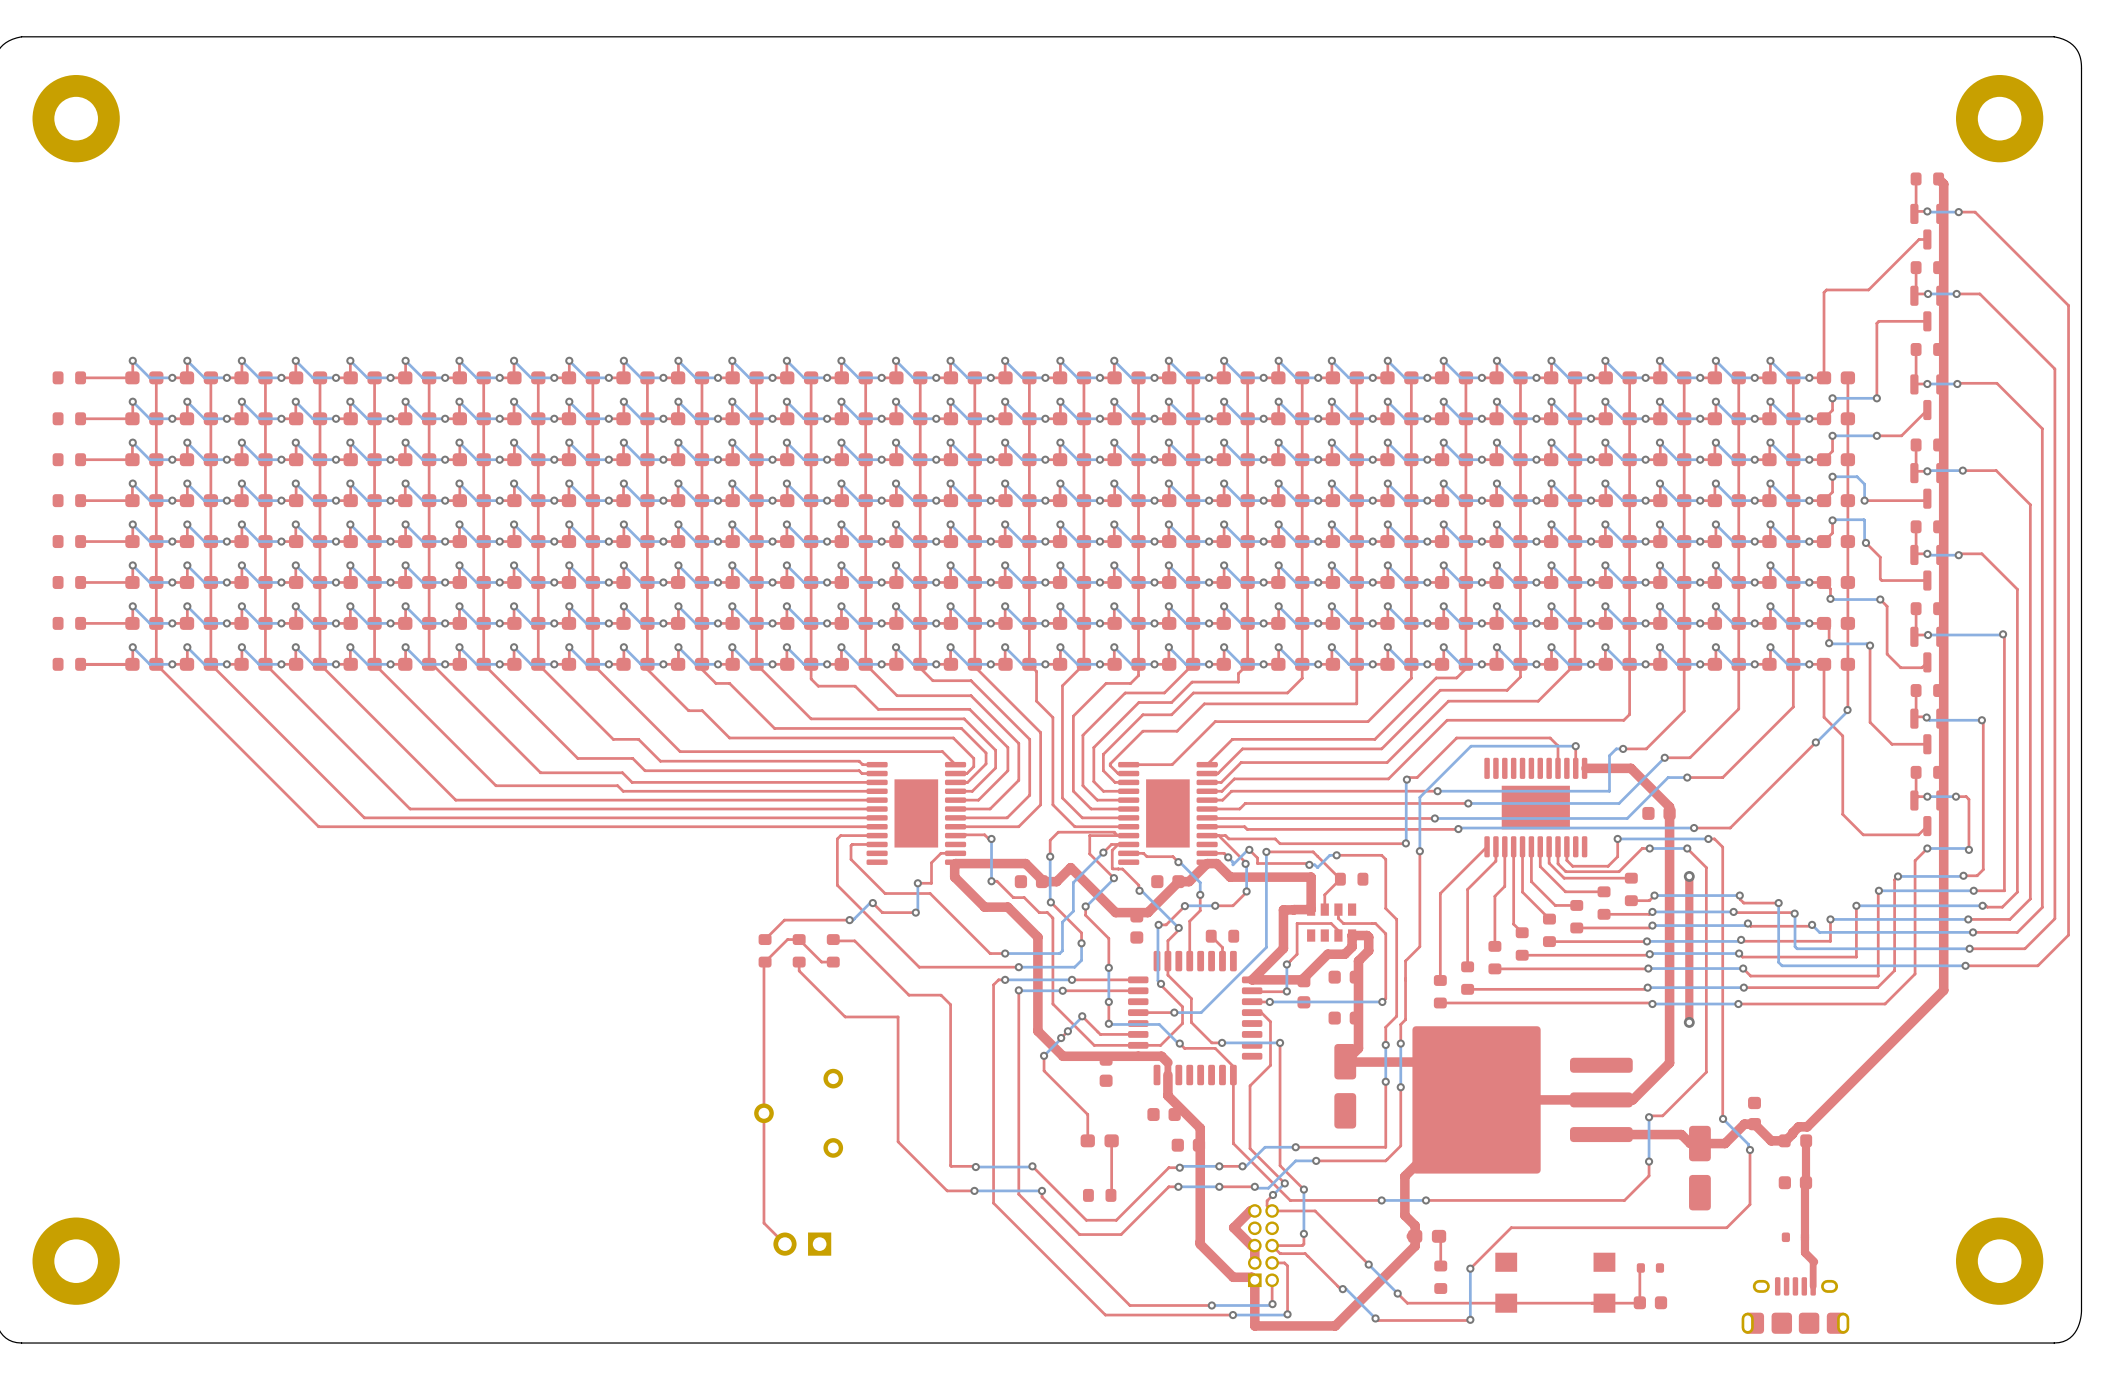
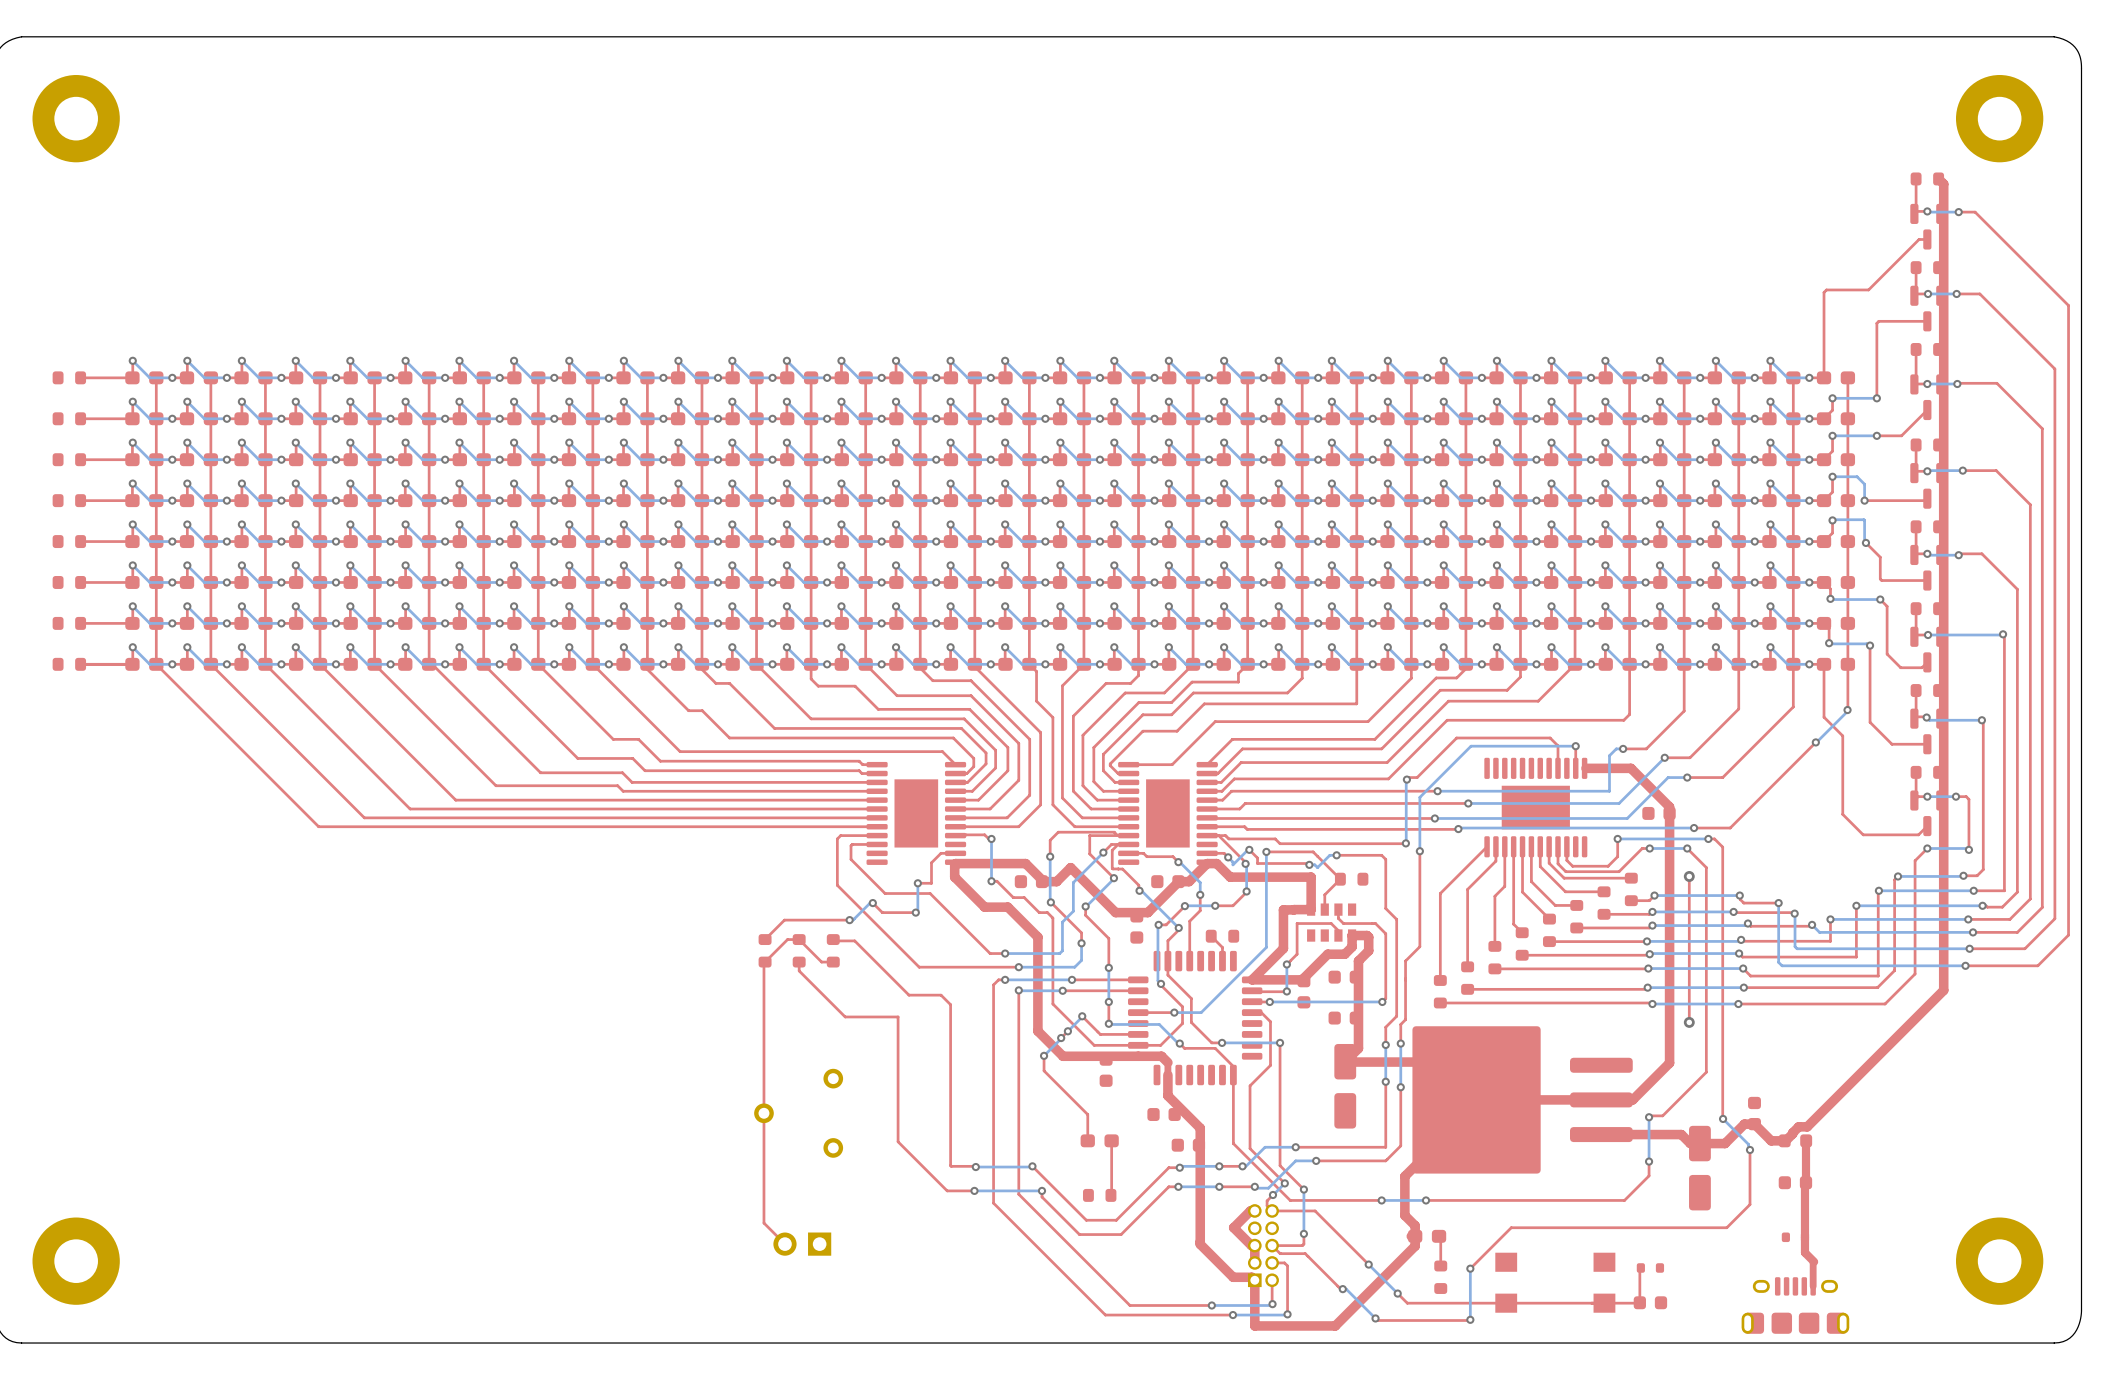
top track width: thick (1689, 877) (1689, 1022) -> thin (1689, 877) (1689, 1022)

